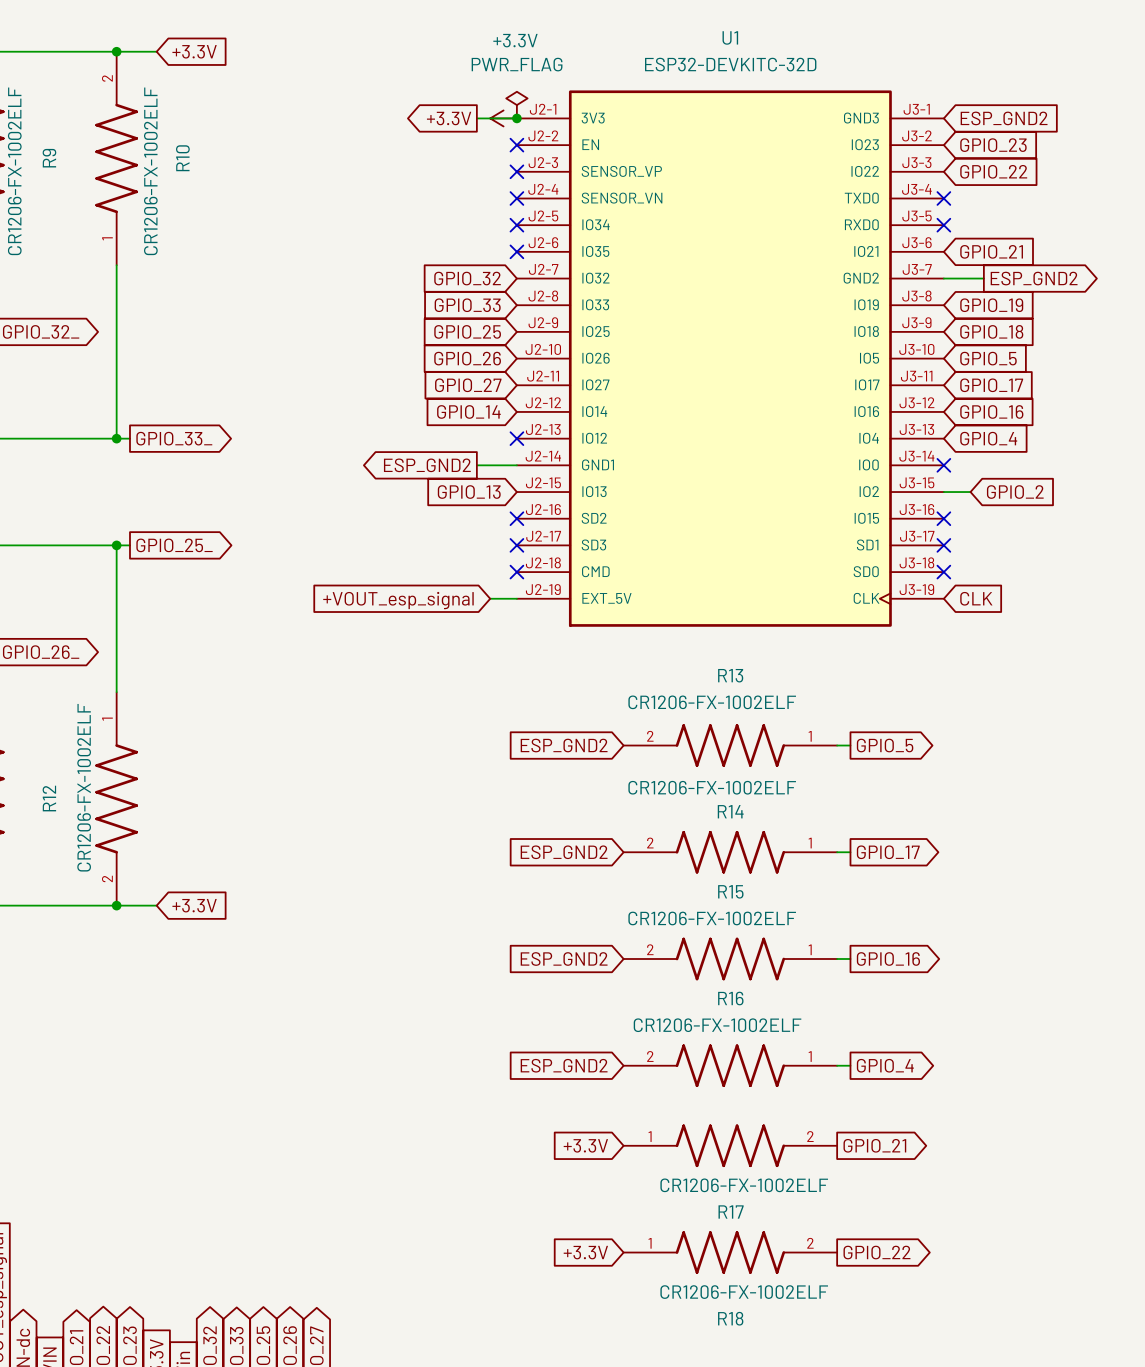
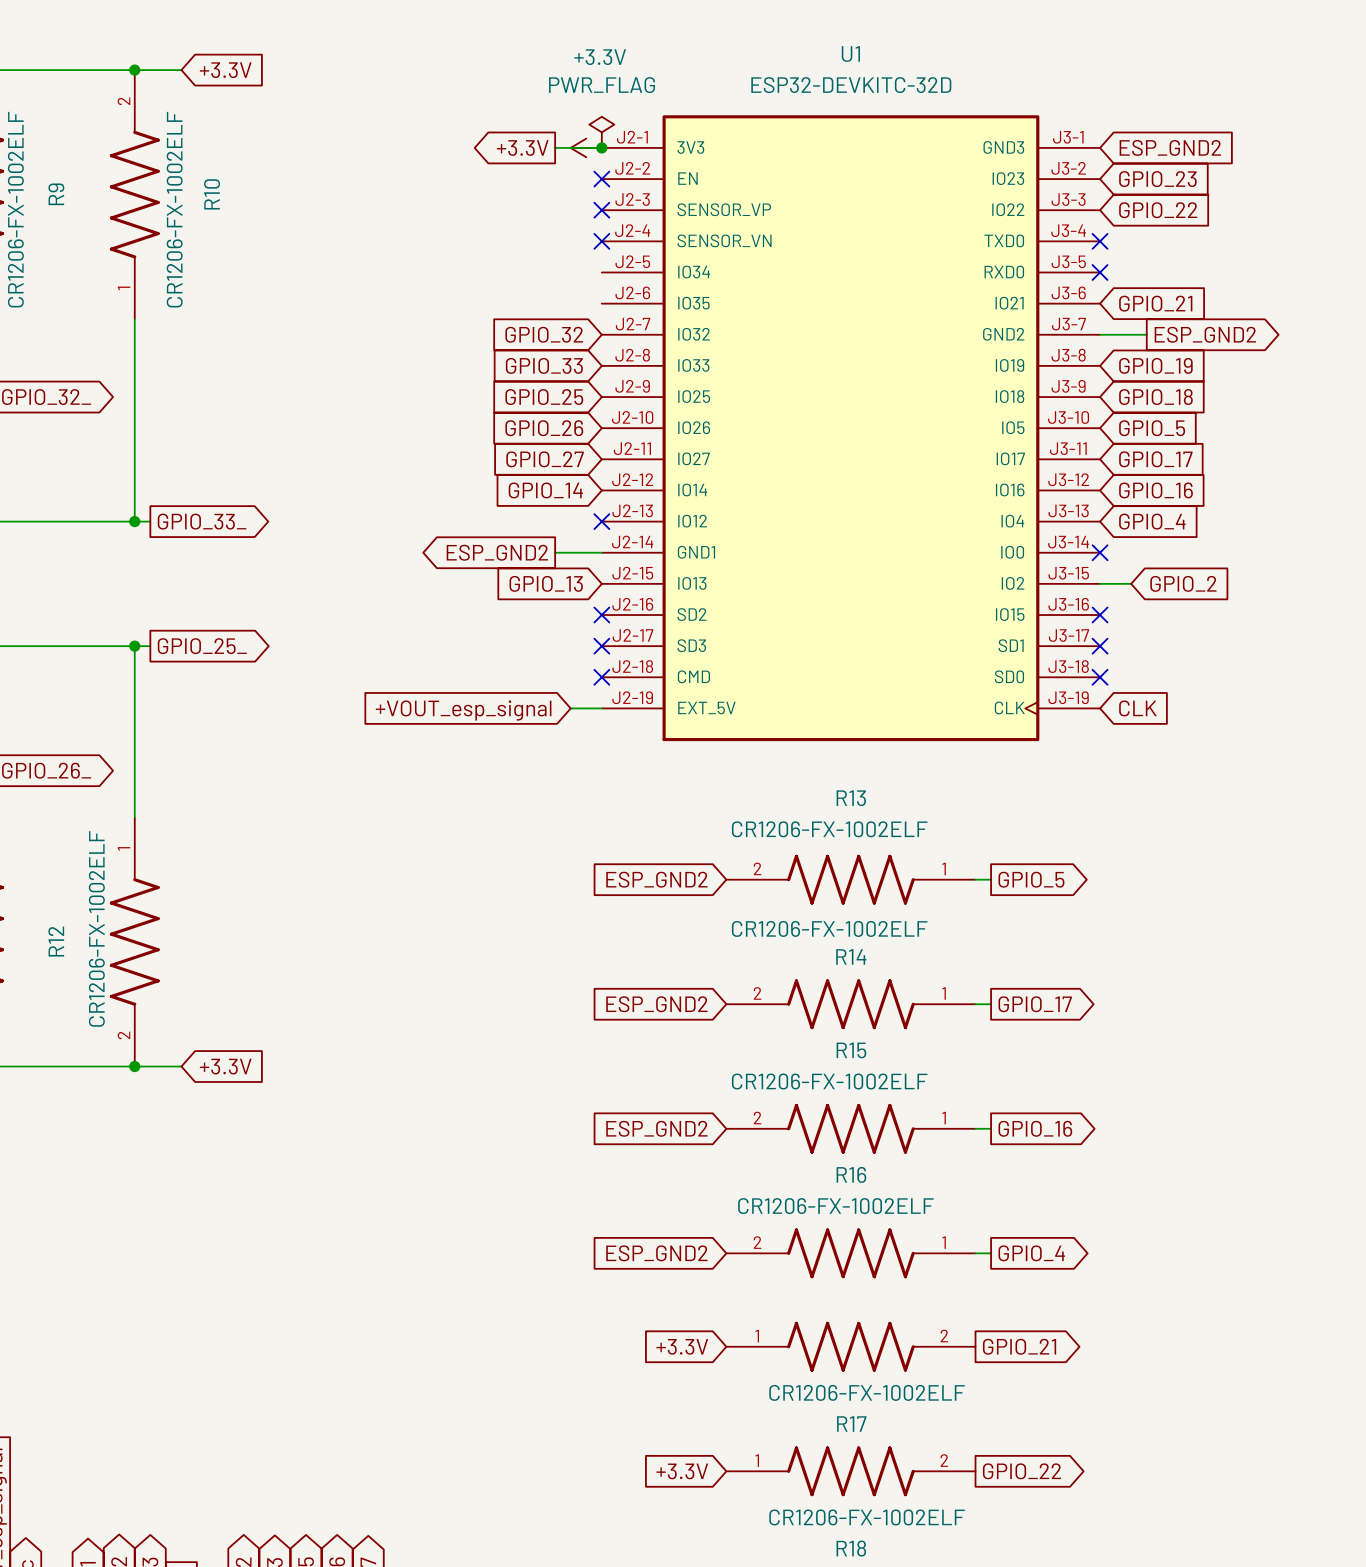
no-connect mark: (516, 225) -> none
no-connect mark: (516, 251) -> none

